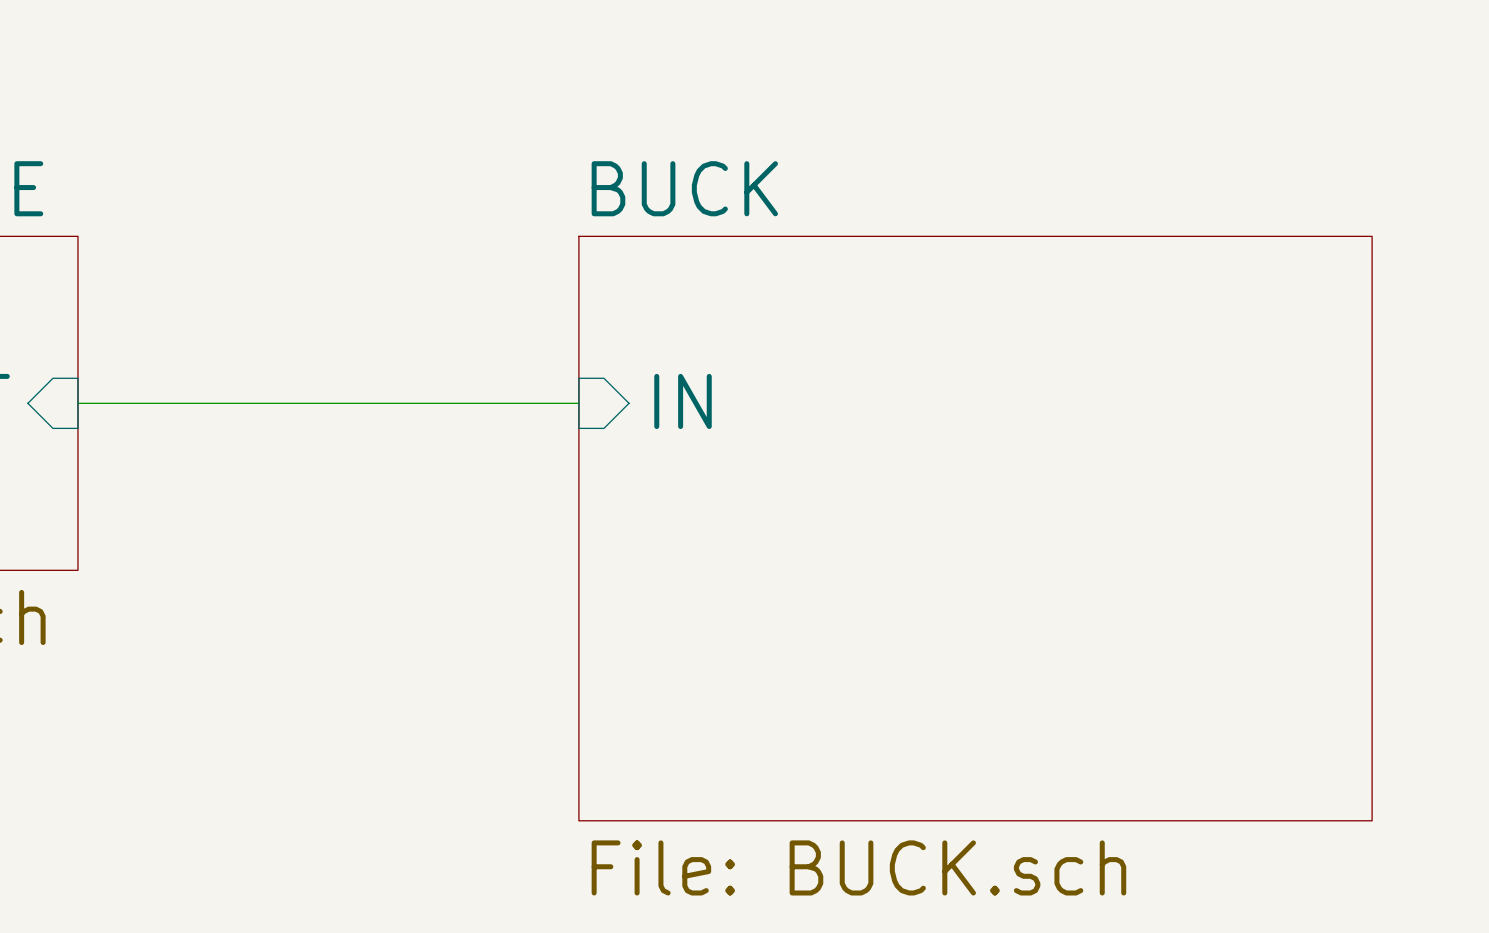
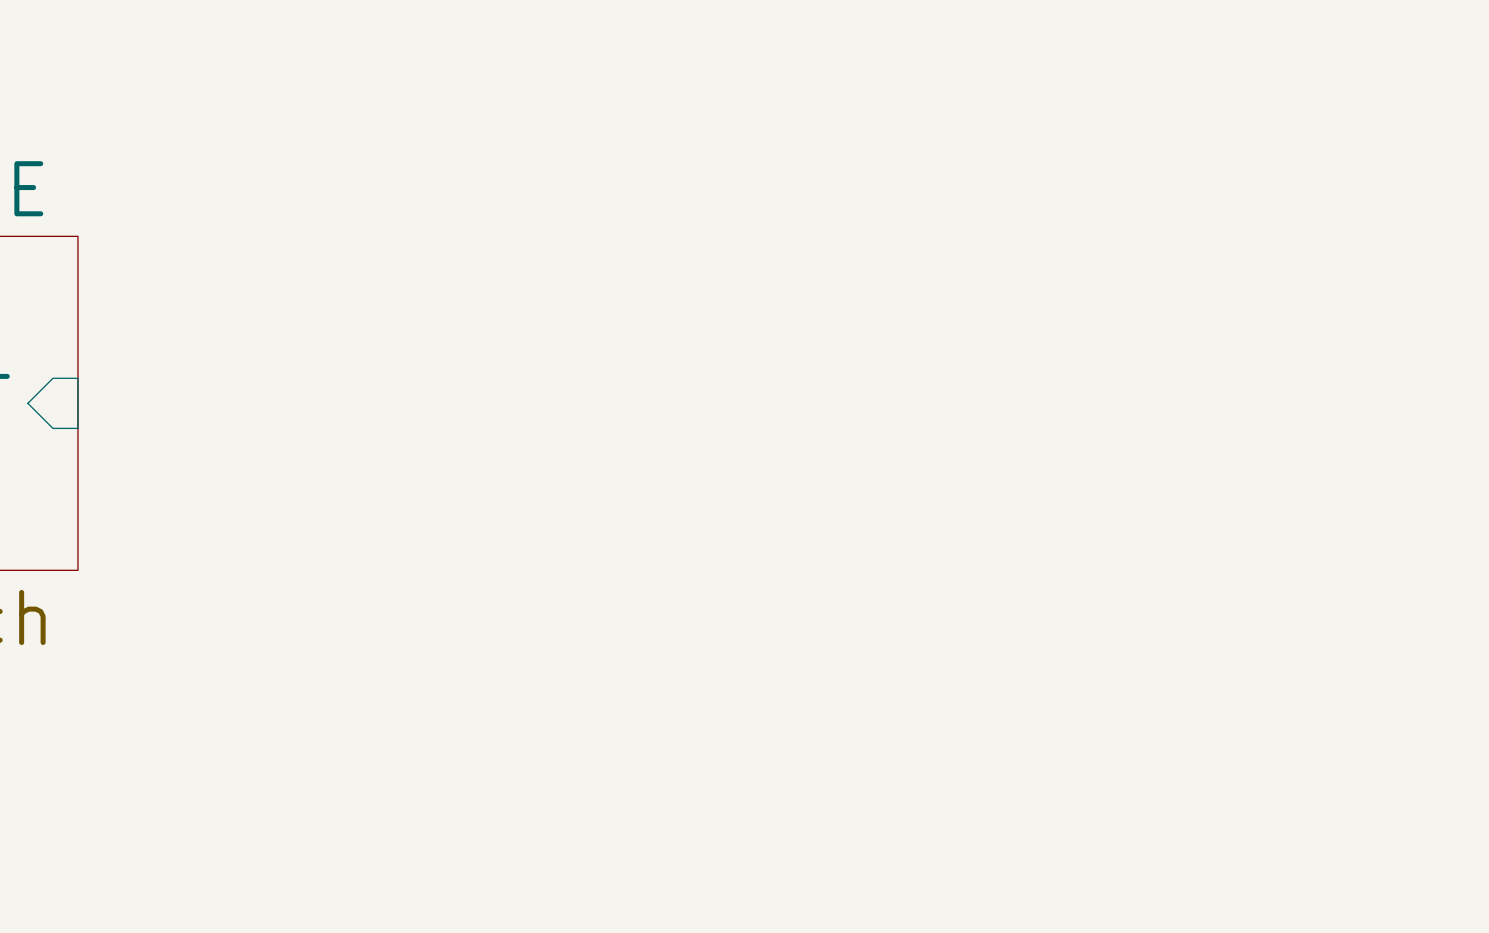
sheet pin: IN (683, 401) -> none
wire: (77, 403) (578, 403) -> none
sheet BUCK: File: BUCK.sch (975, 528) -> none

